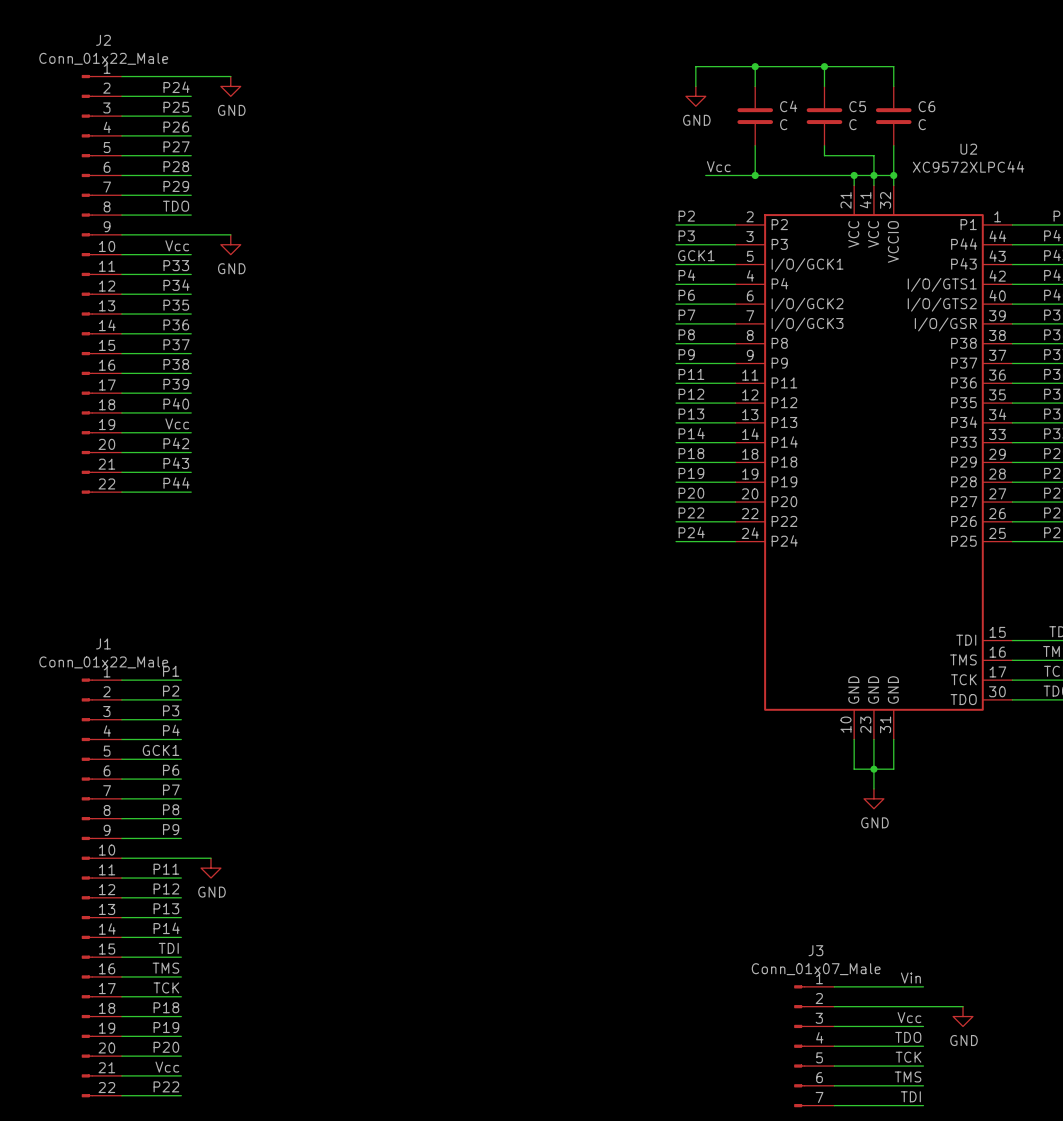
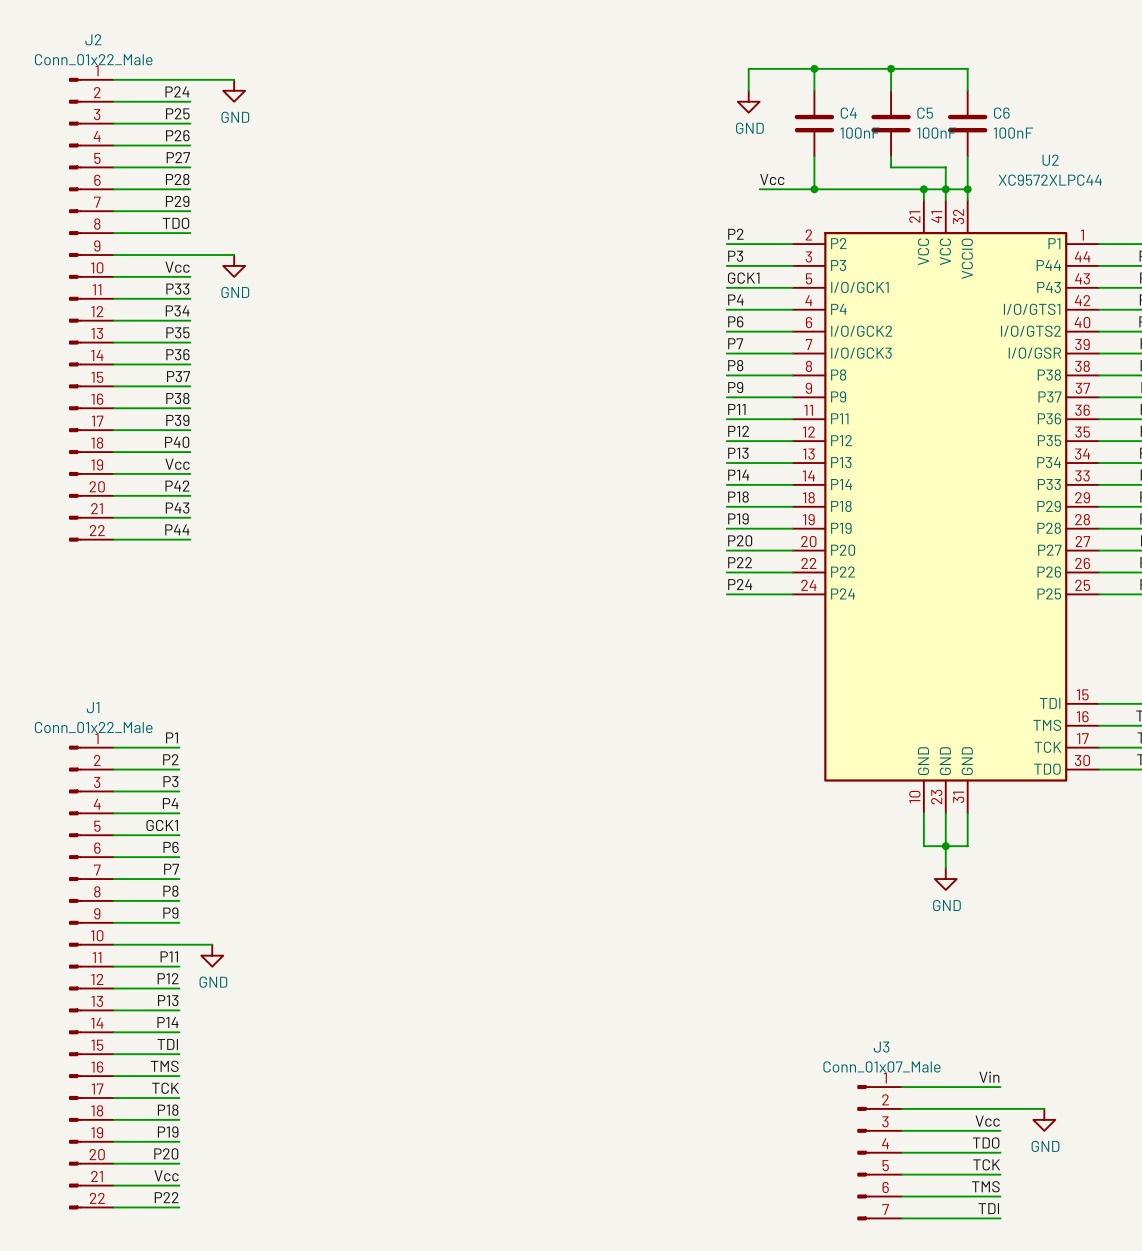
C4 value: C (783, 124) -> 100nF (860, 133)
C5 value: C (852, 124) -> 100nF (936, 133)
C6 value: C (922, 124) -> 100nF (1013, 133)

